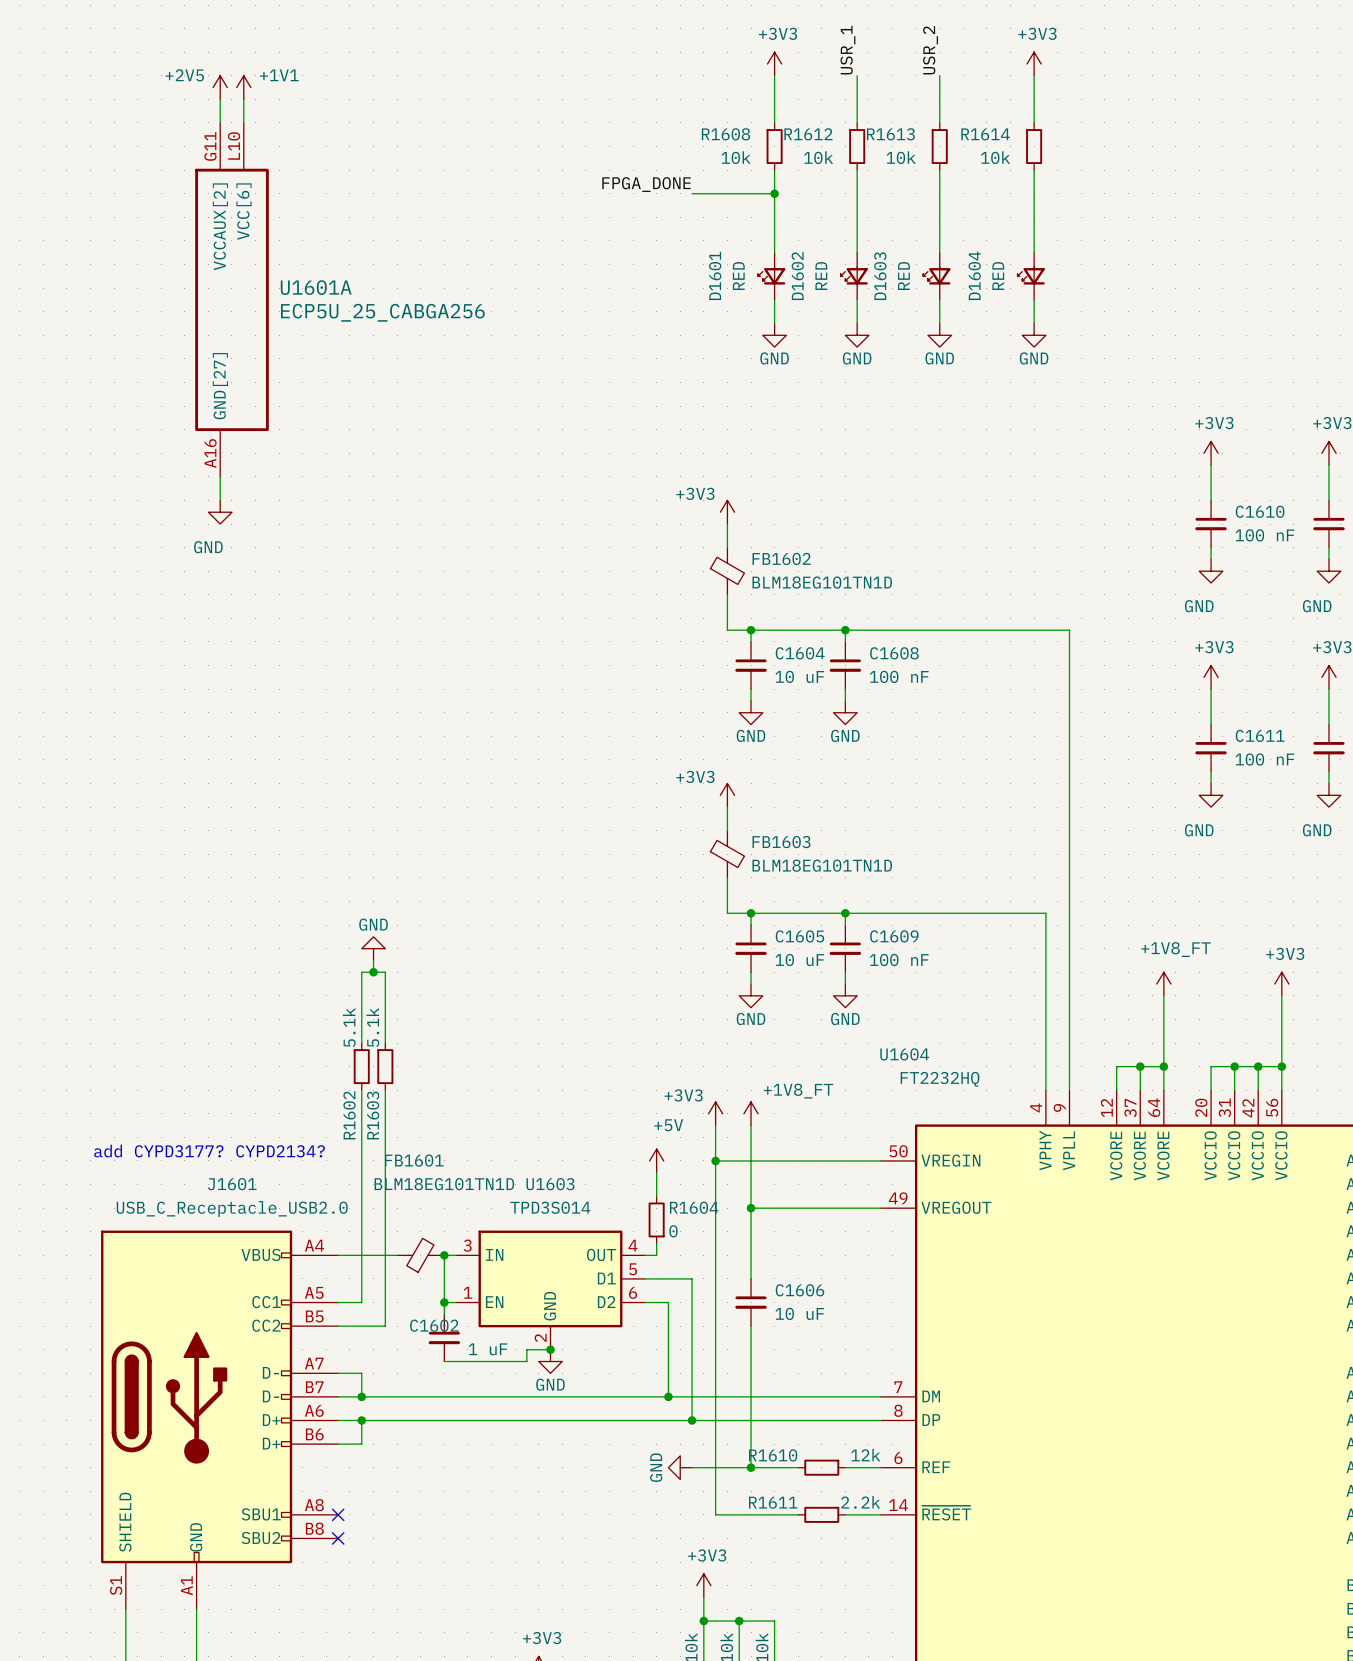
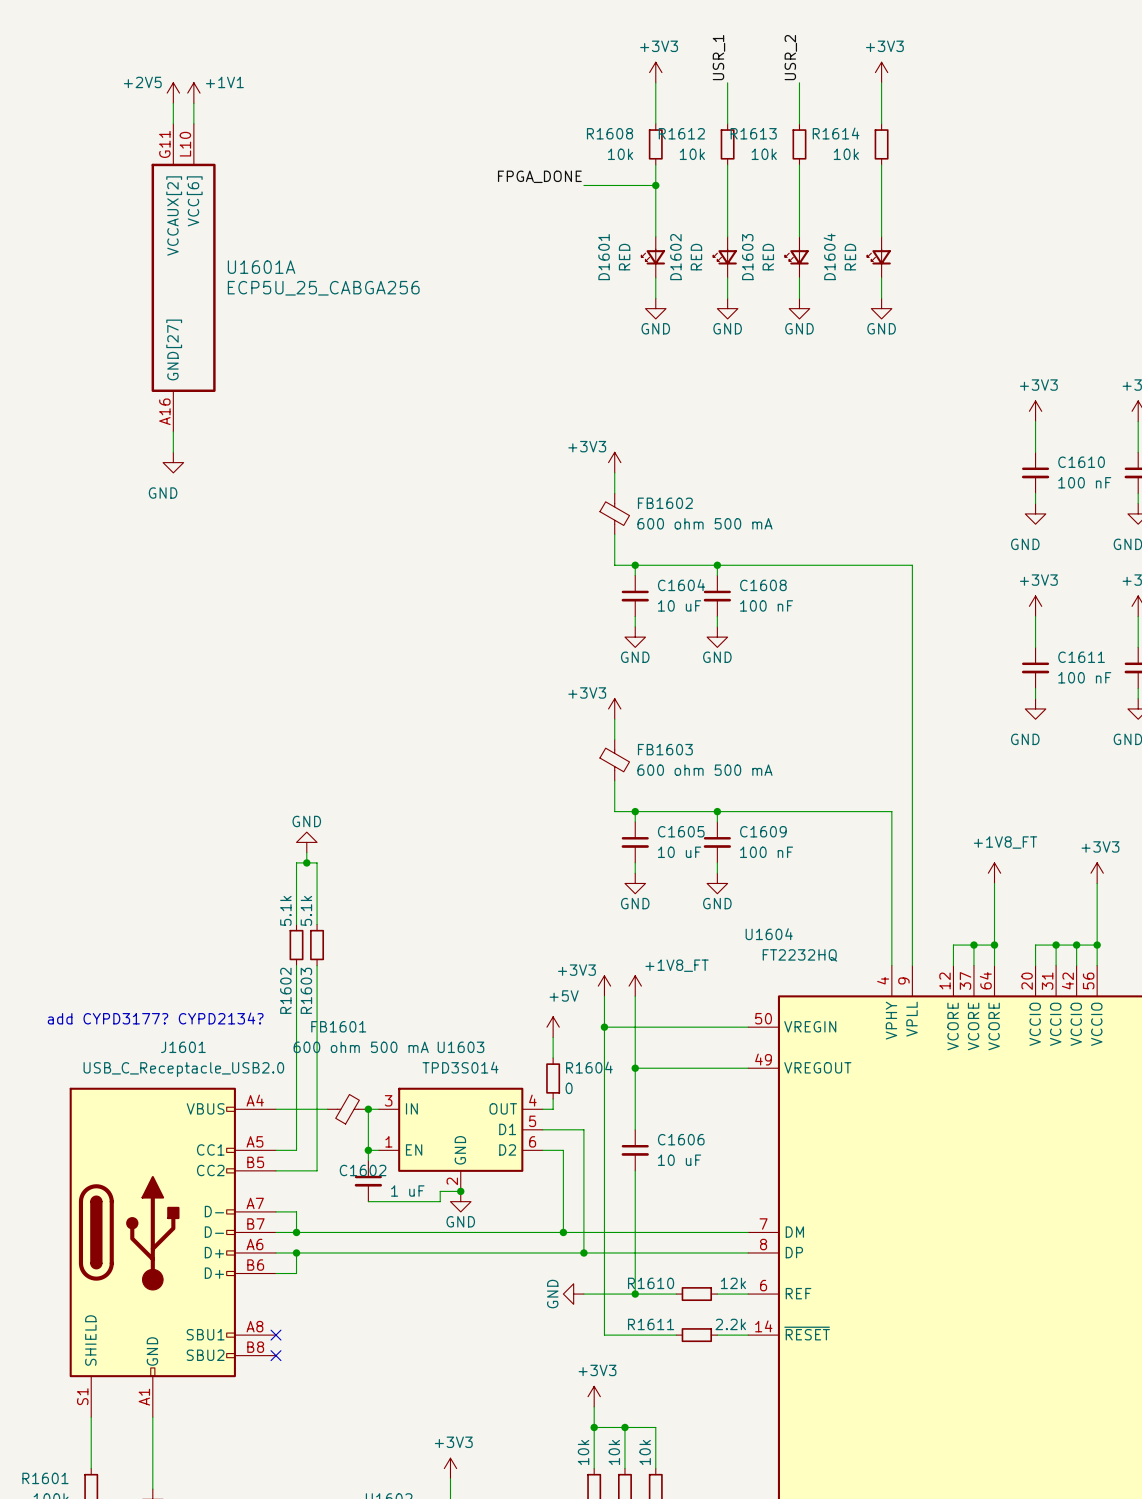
FB1602 value: BLM18EG101TN1D (822, 582) -> 600 ohm 500 mA (704, 523)
FB1603 value: BLM18EG101TN1D (822, 865) -> 600 ohm 500 mA (704, 770)
FB1601 value: BLM18EG101TN1D (444, 1184) -> 600 ohm 500 mA (361, 1047)

